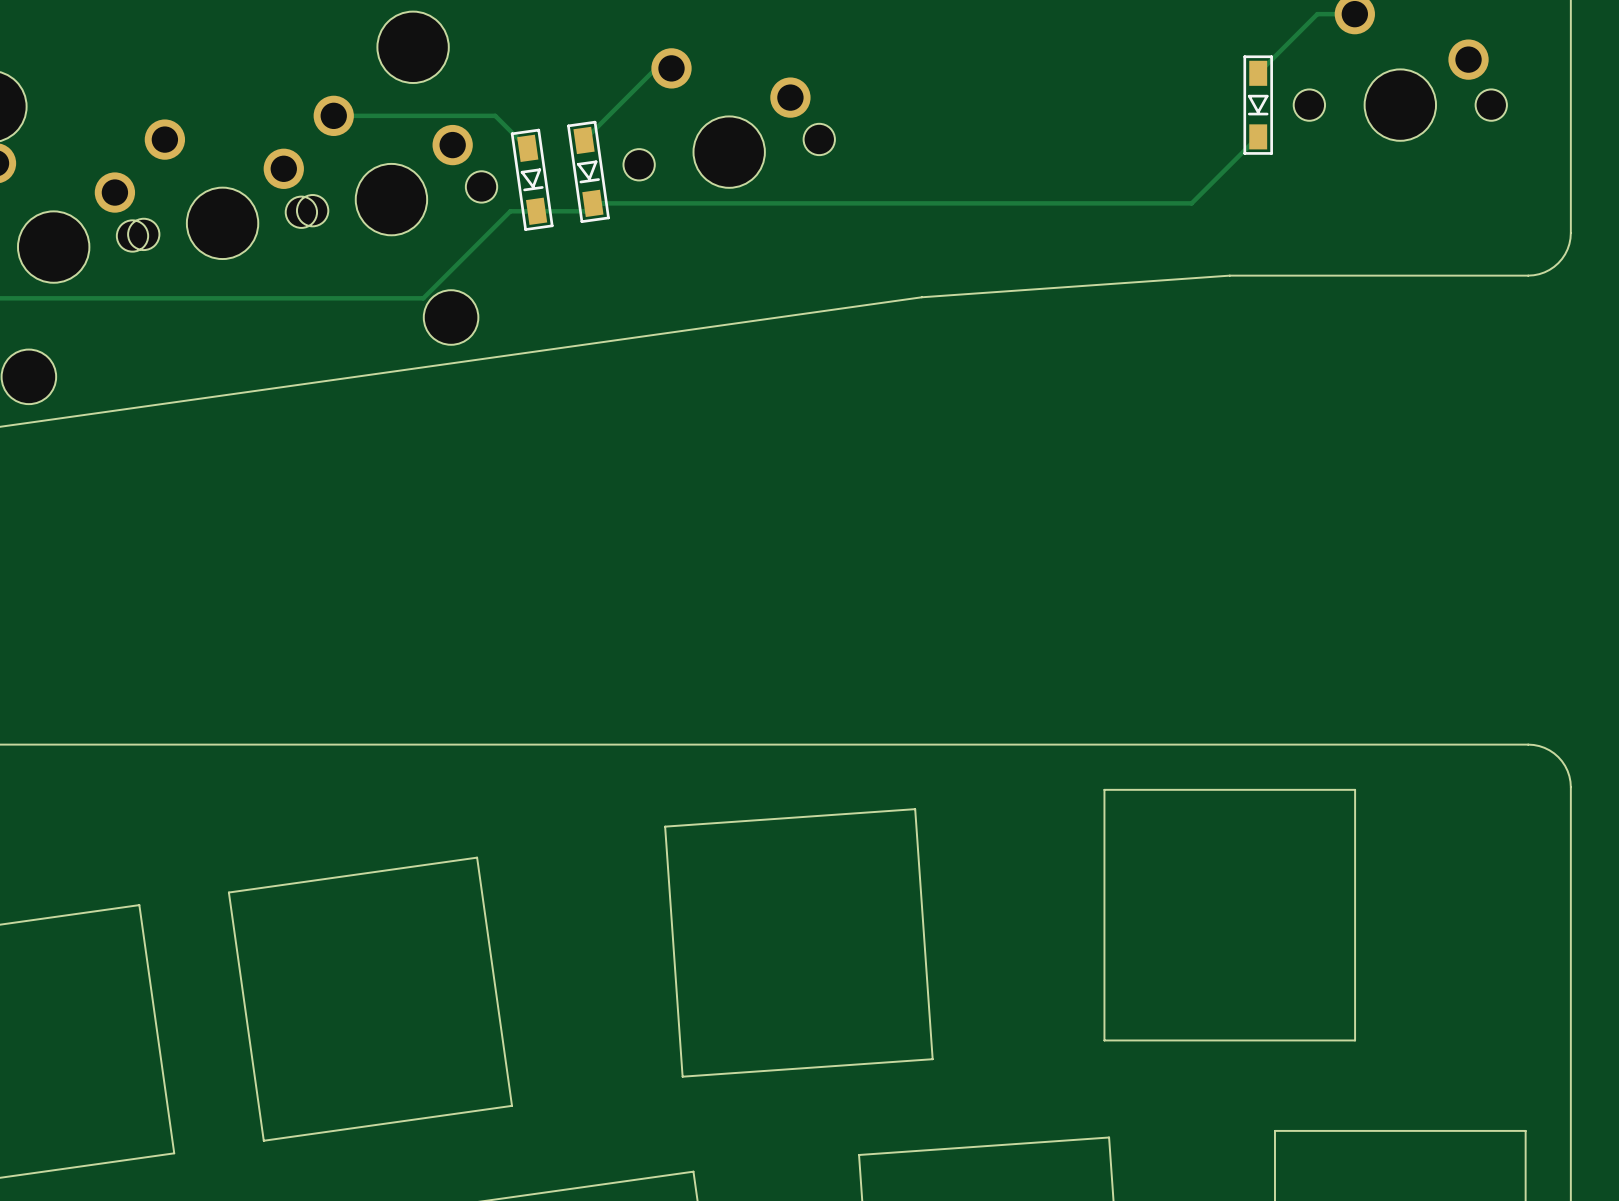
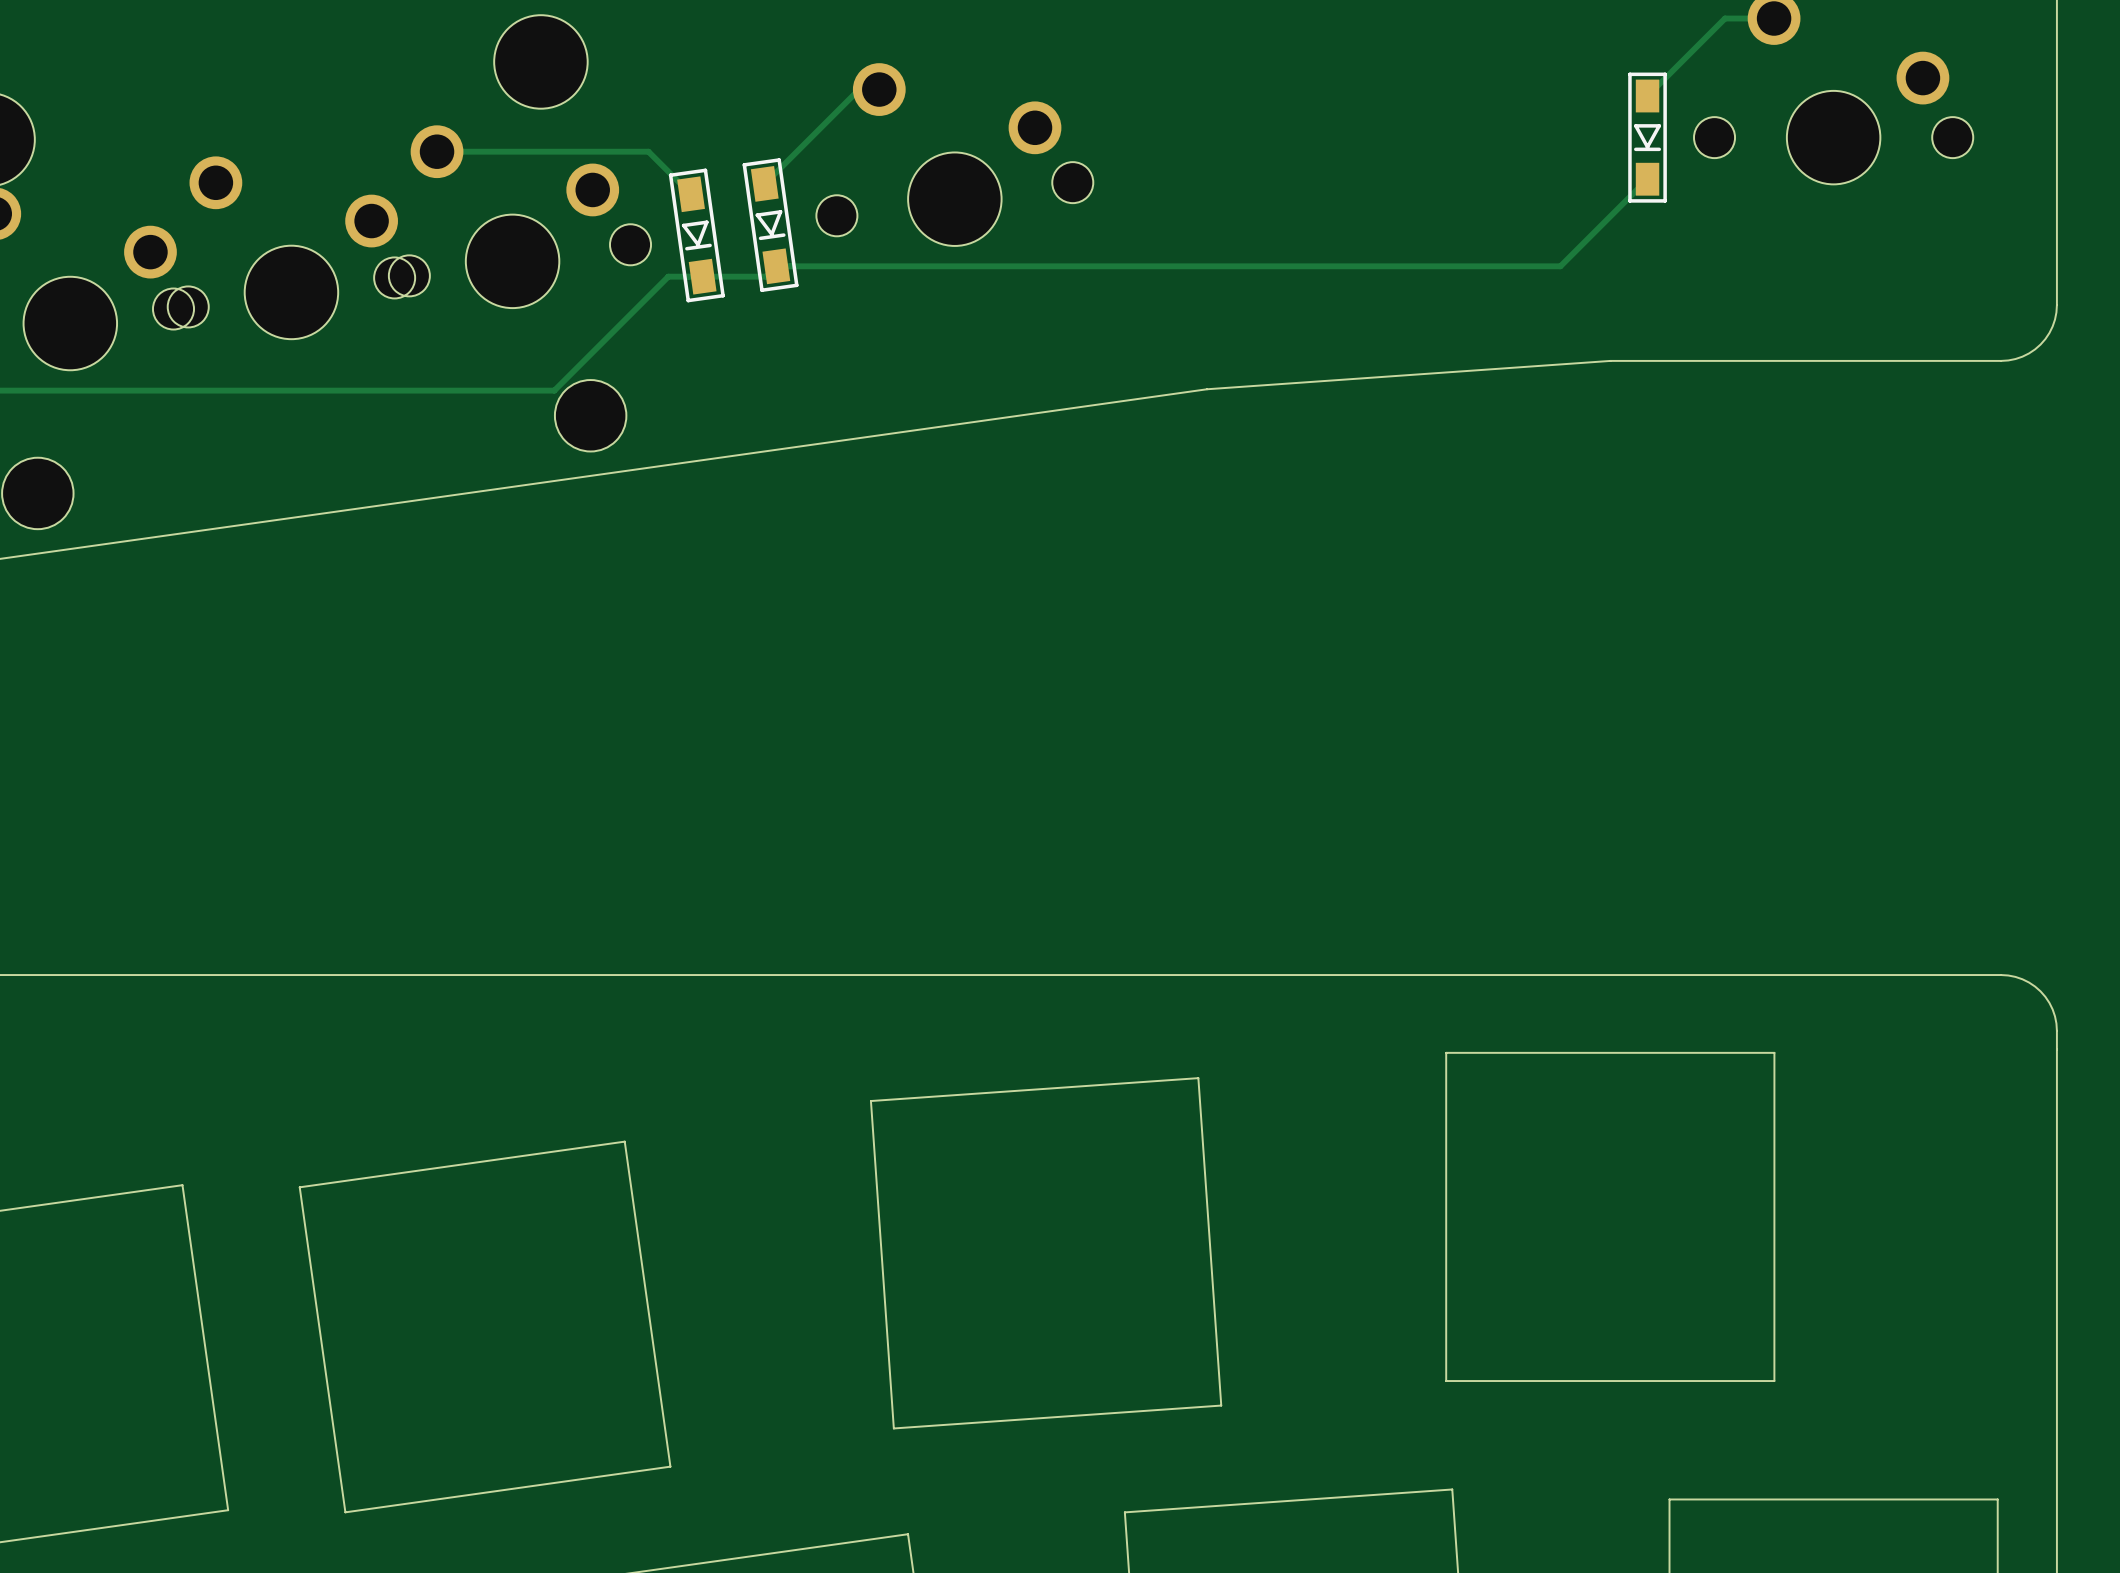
board edge: (1104, 804) (1104, 789) (1355, 789) (1355, 804) -> (1446, 1052) (1774, 1052)
board edge: (915, 809) (932, 1059) (682, 1076) (665, 826) (915, 809) -> (1198, 1078) (1221, 1405) (893, 1428) (870, 1101) (1198, 1078)
board edge: (477, 857) (512, 1105) (263, 1140) (228, 892) (477, 857) -> (624, 1141) (670, 1466) (345, 1512) (299, 1187) (624, 1141)
board edge: (1104, 1040) (1355, 1040) -> (1446, 1362) (1446, 1381) (1774, 1381) (1774, 1362)
board edge: (1274, 1145) (1274, 1130) (1525, 1130) (1525, 1145) -> (1669, 1499) (1997, 1499)

